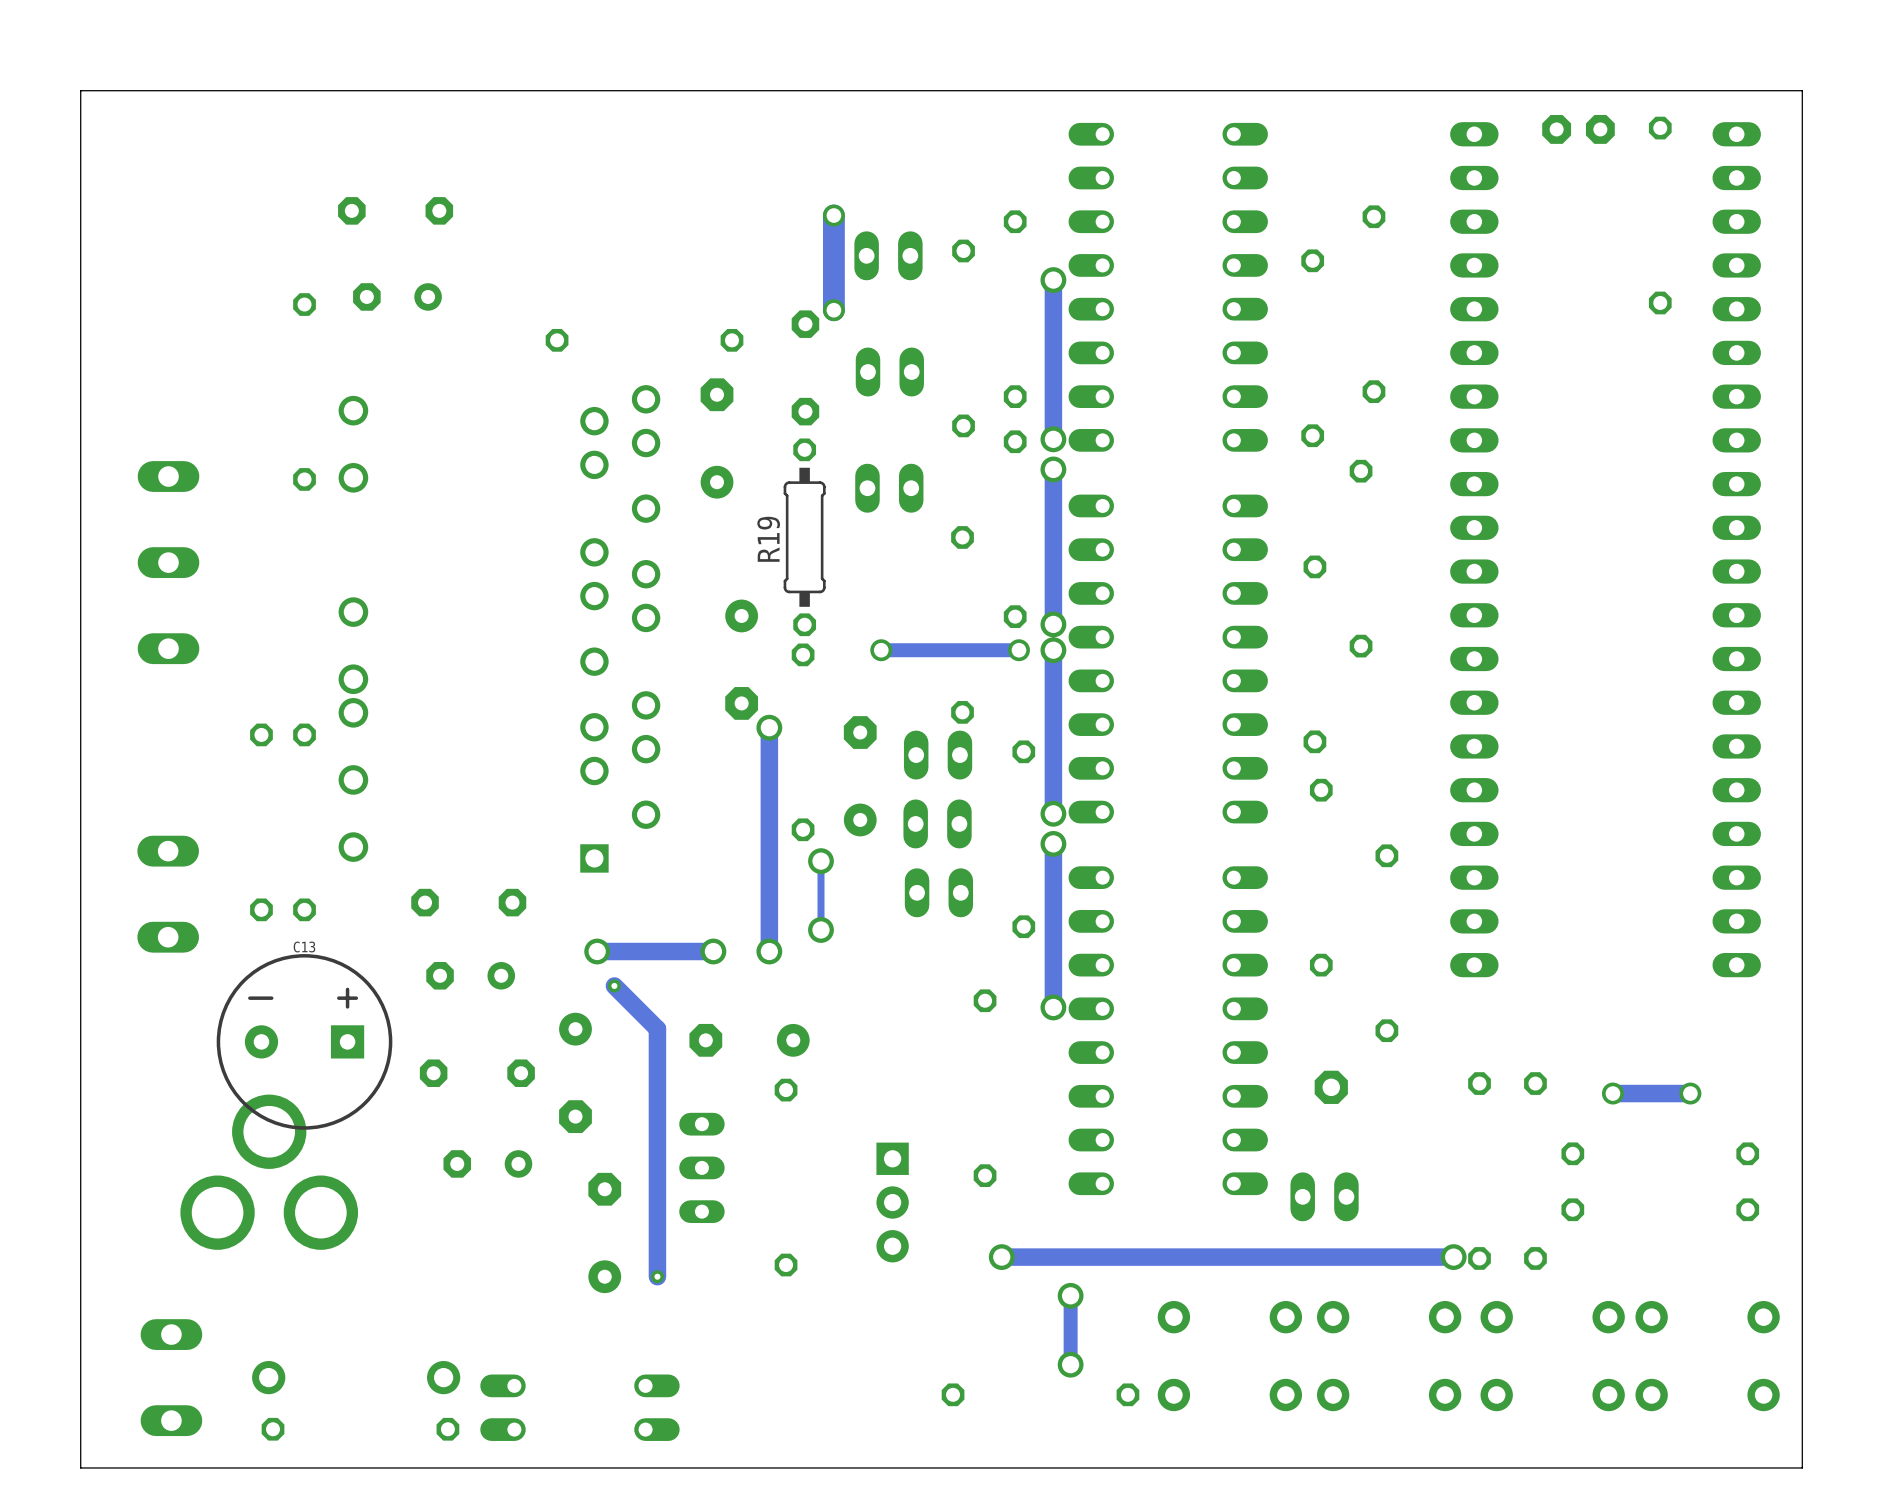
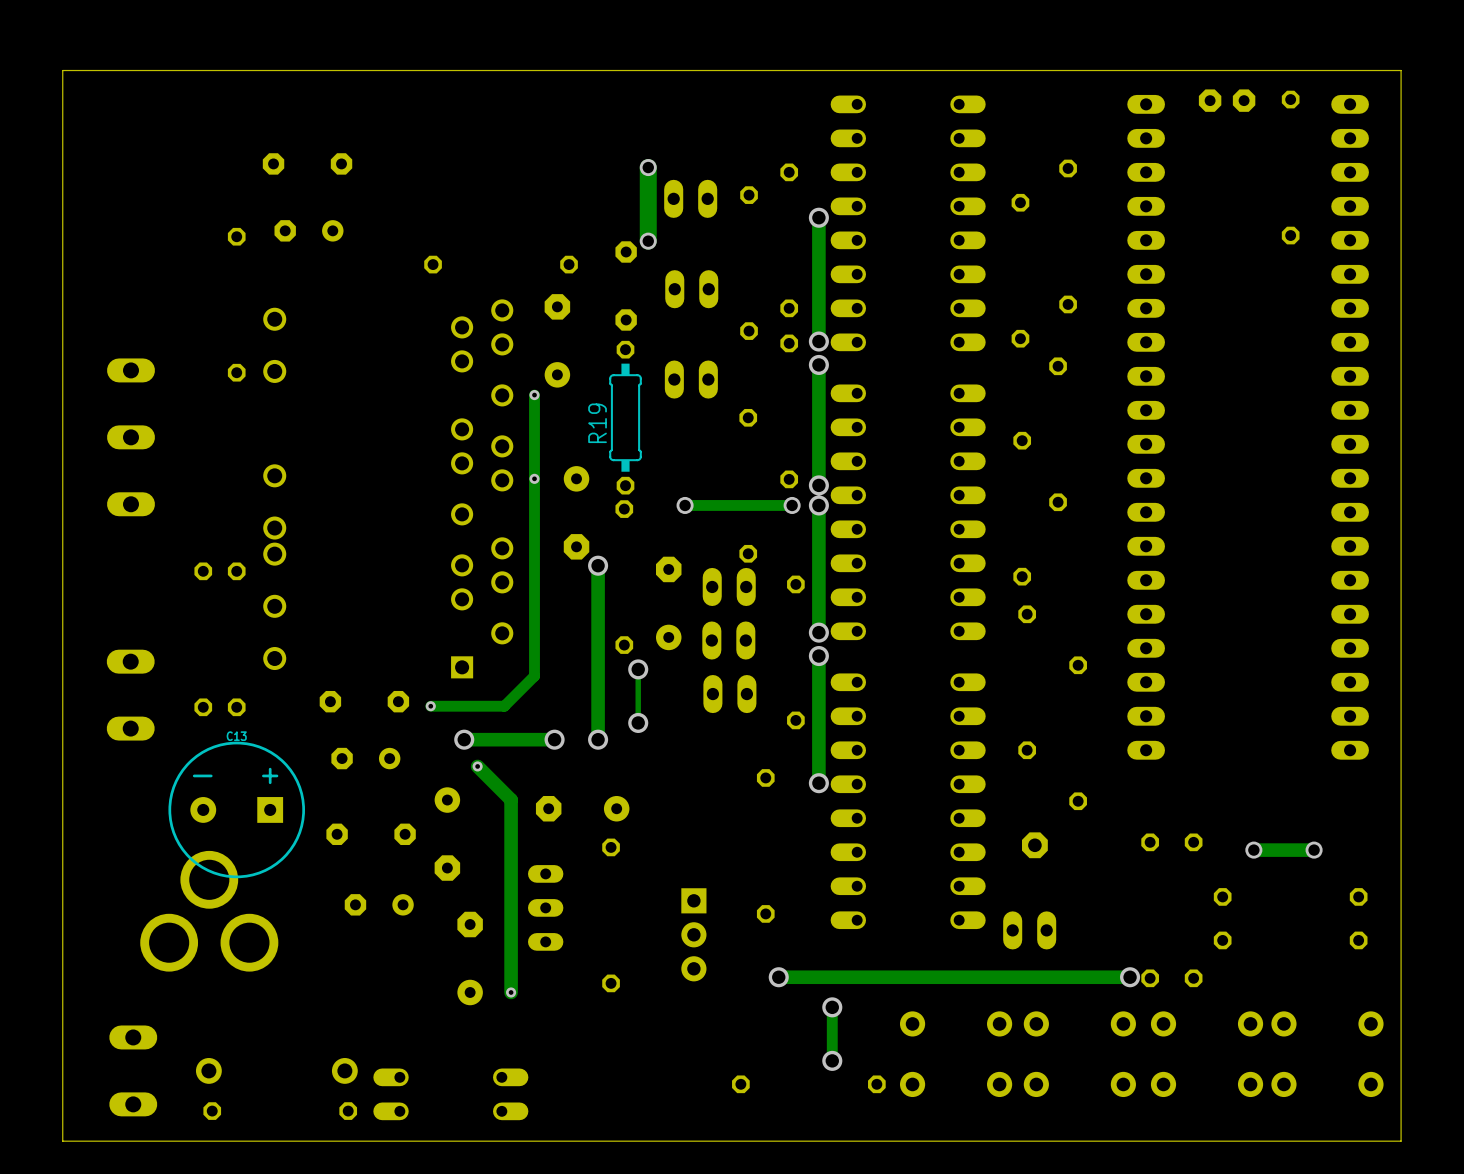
track: none -> (534, 395) (534, 676) (504, 706) (430, 706)
via: none -> (534, 395)
via: none -> (534, 478)
via: none -> (430, 706)

